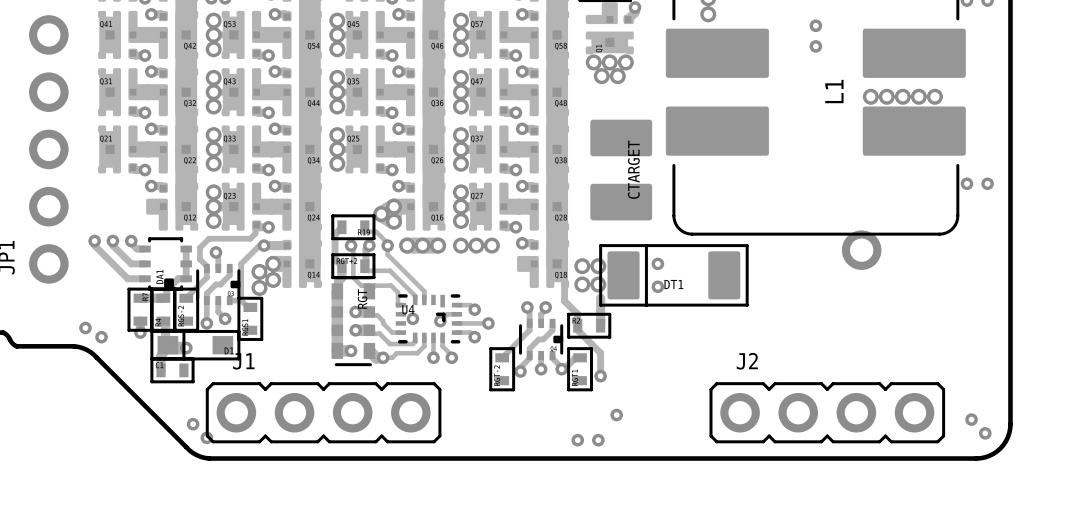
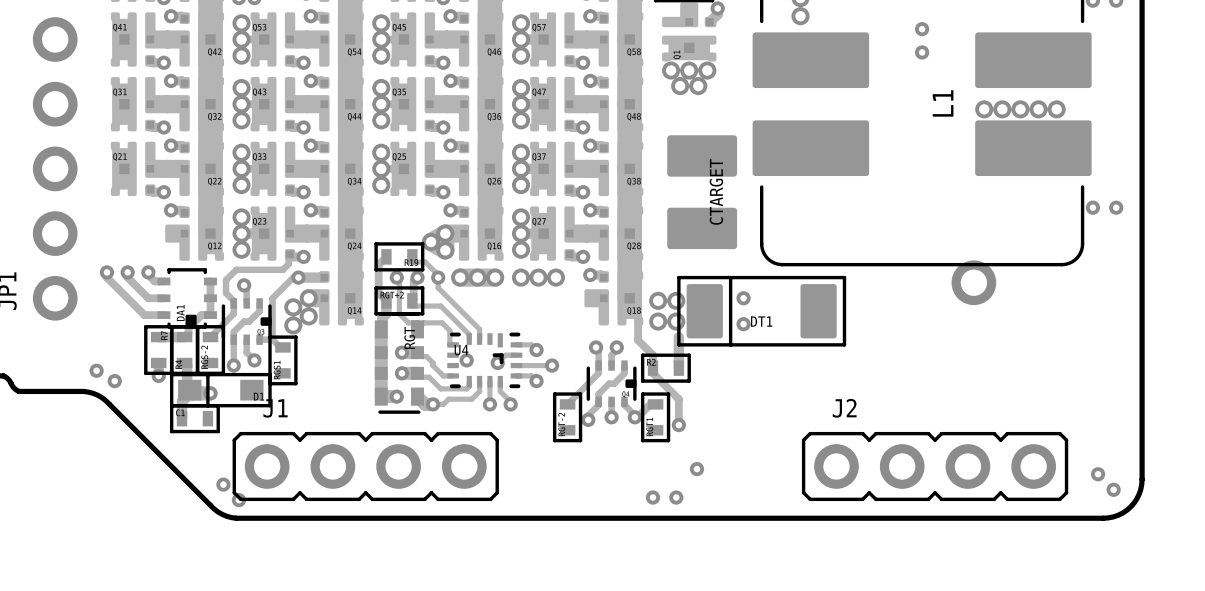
via: (193, 424) -> none
via: none -> (223, 484)
via: (206, 437) -> none
via: none -> (238, 500)

